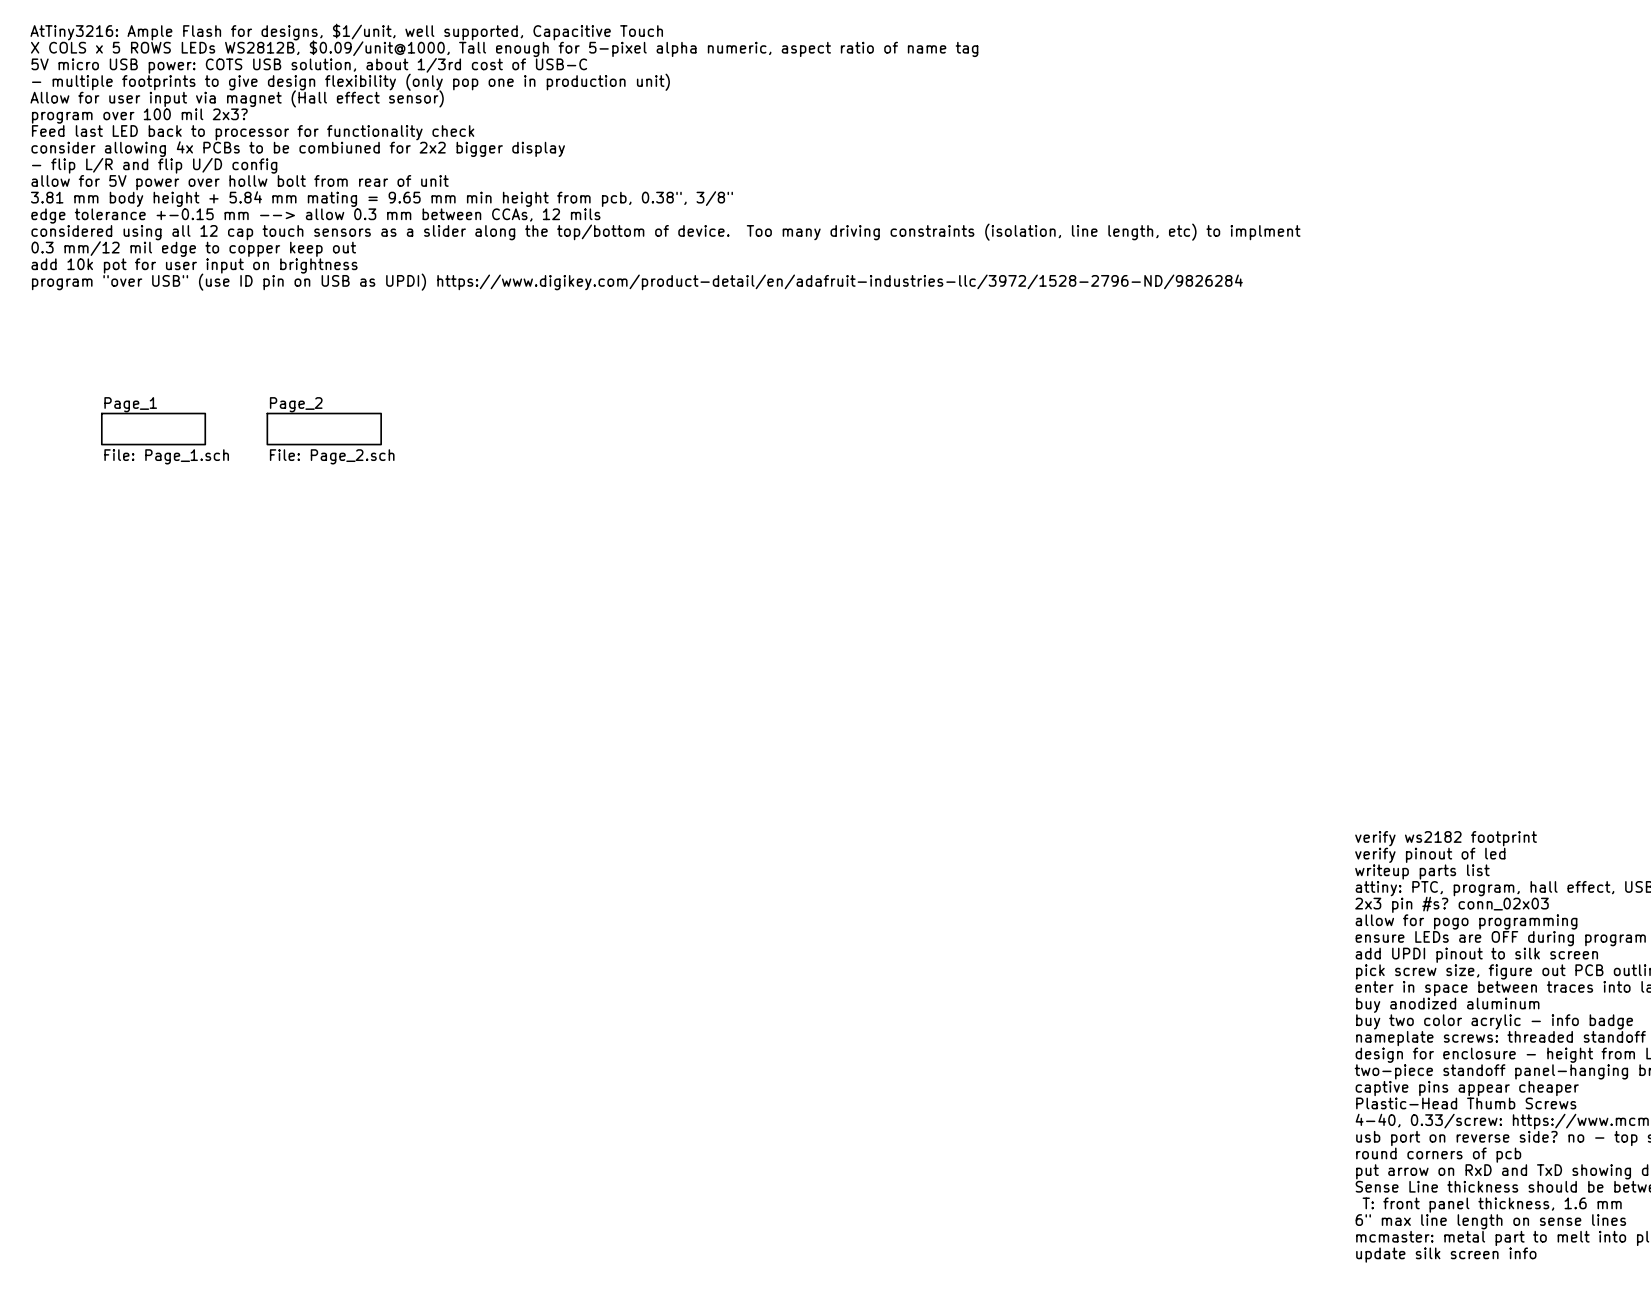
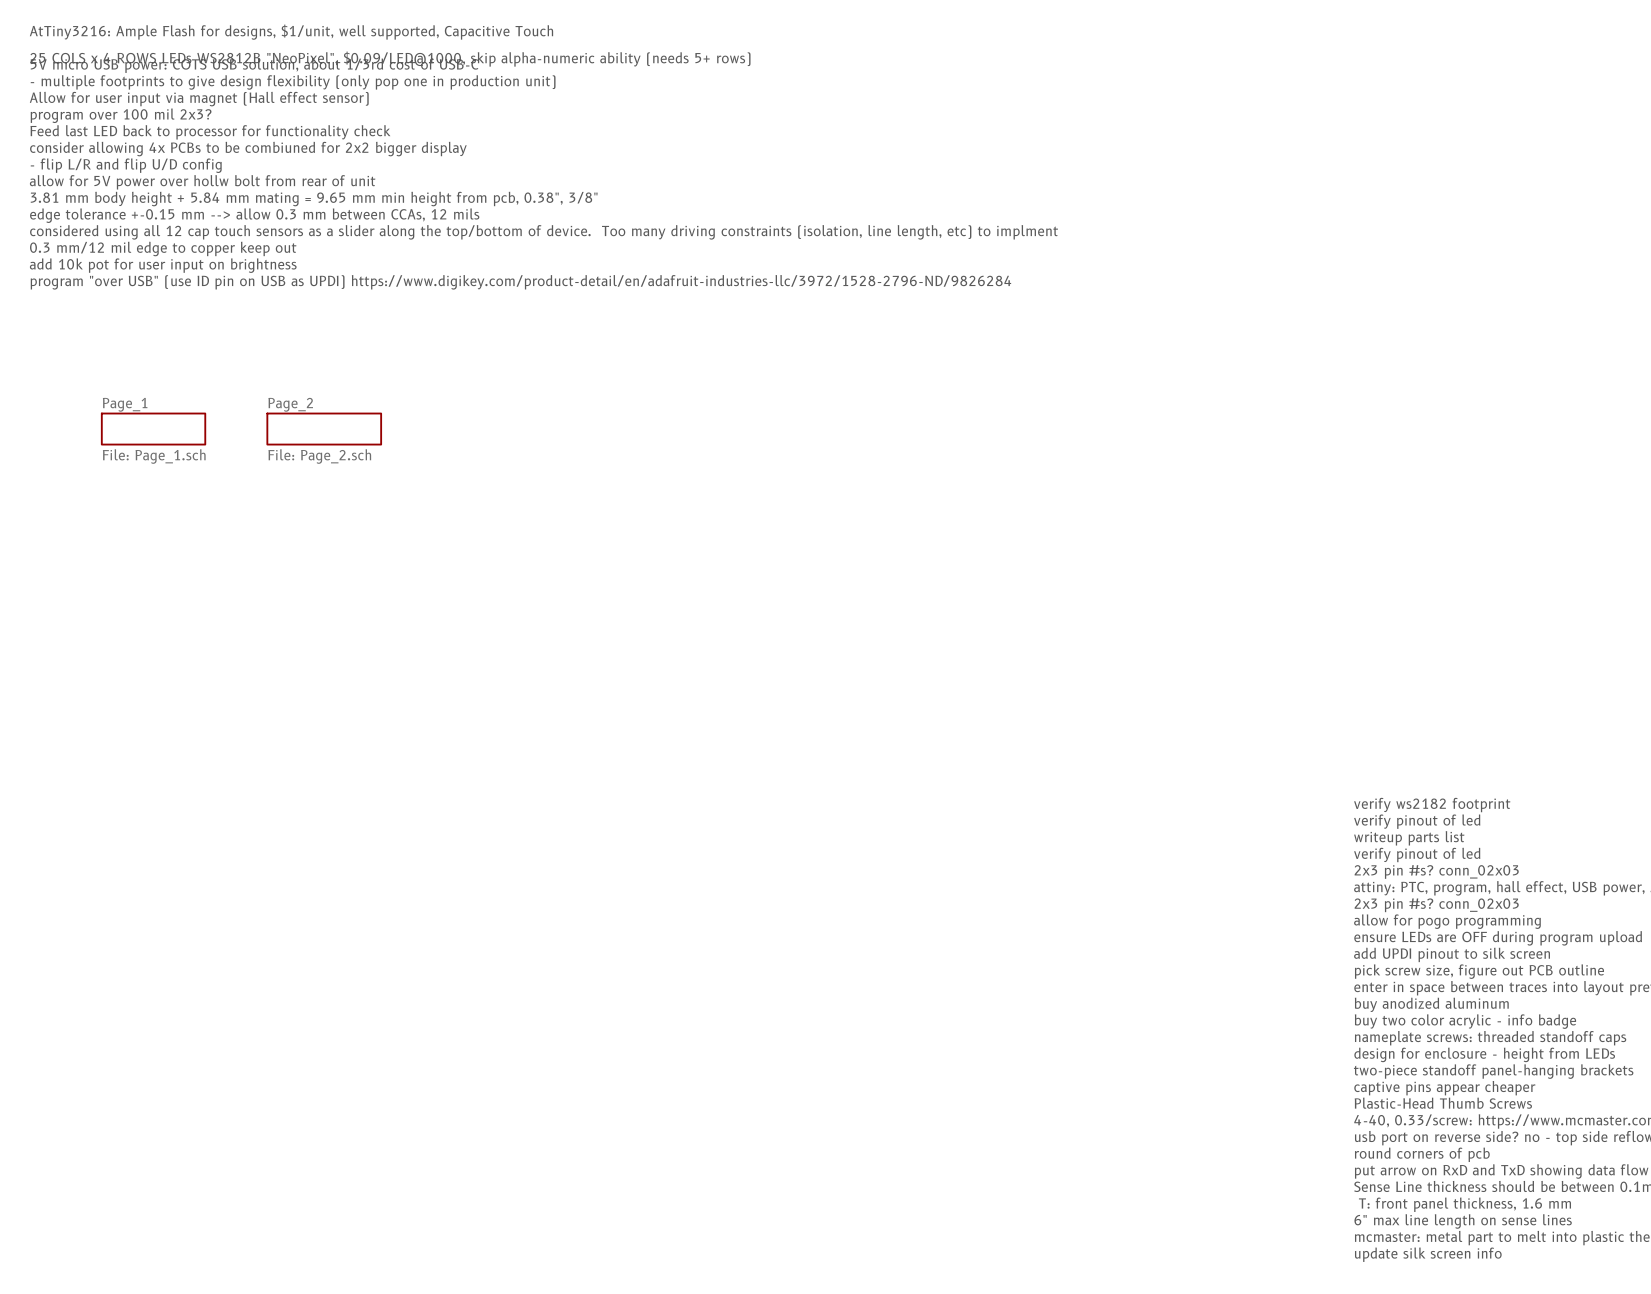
text: X COLS x 5 ROWS LEDs WS2812B, $0.09/unit@1000, Tall enough for 5-pixel alpha numeric, aspect ratio of name tag (504, 48) -> none
text: none -> 25 COLS x 4 ROWS LEDs WS2812B "NeoPixel", $0.09/LED@1000, skip alpha-numeric ability (needs 5+ rows) (390, 59)
text: none -> verify ws2182 footprint (1432, 805)
text: none -> verify pinout of led (1417, 821)
text: verify ws2182 footprint (1446, 838) -> writeup parts list (1409, 838)
text: writeup parts list (1422, 872) -> 2x3 pin #s? conn_02x03 (1436, 871)

